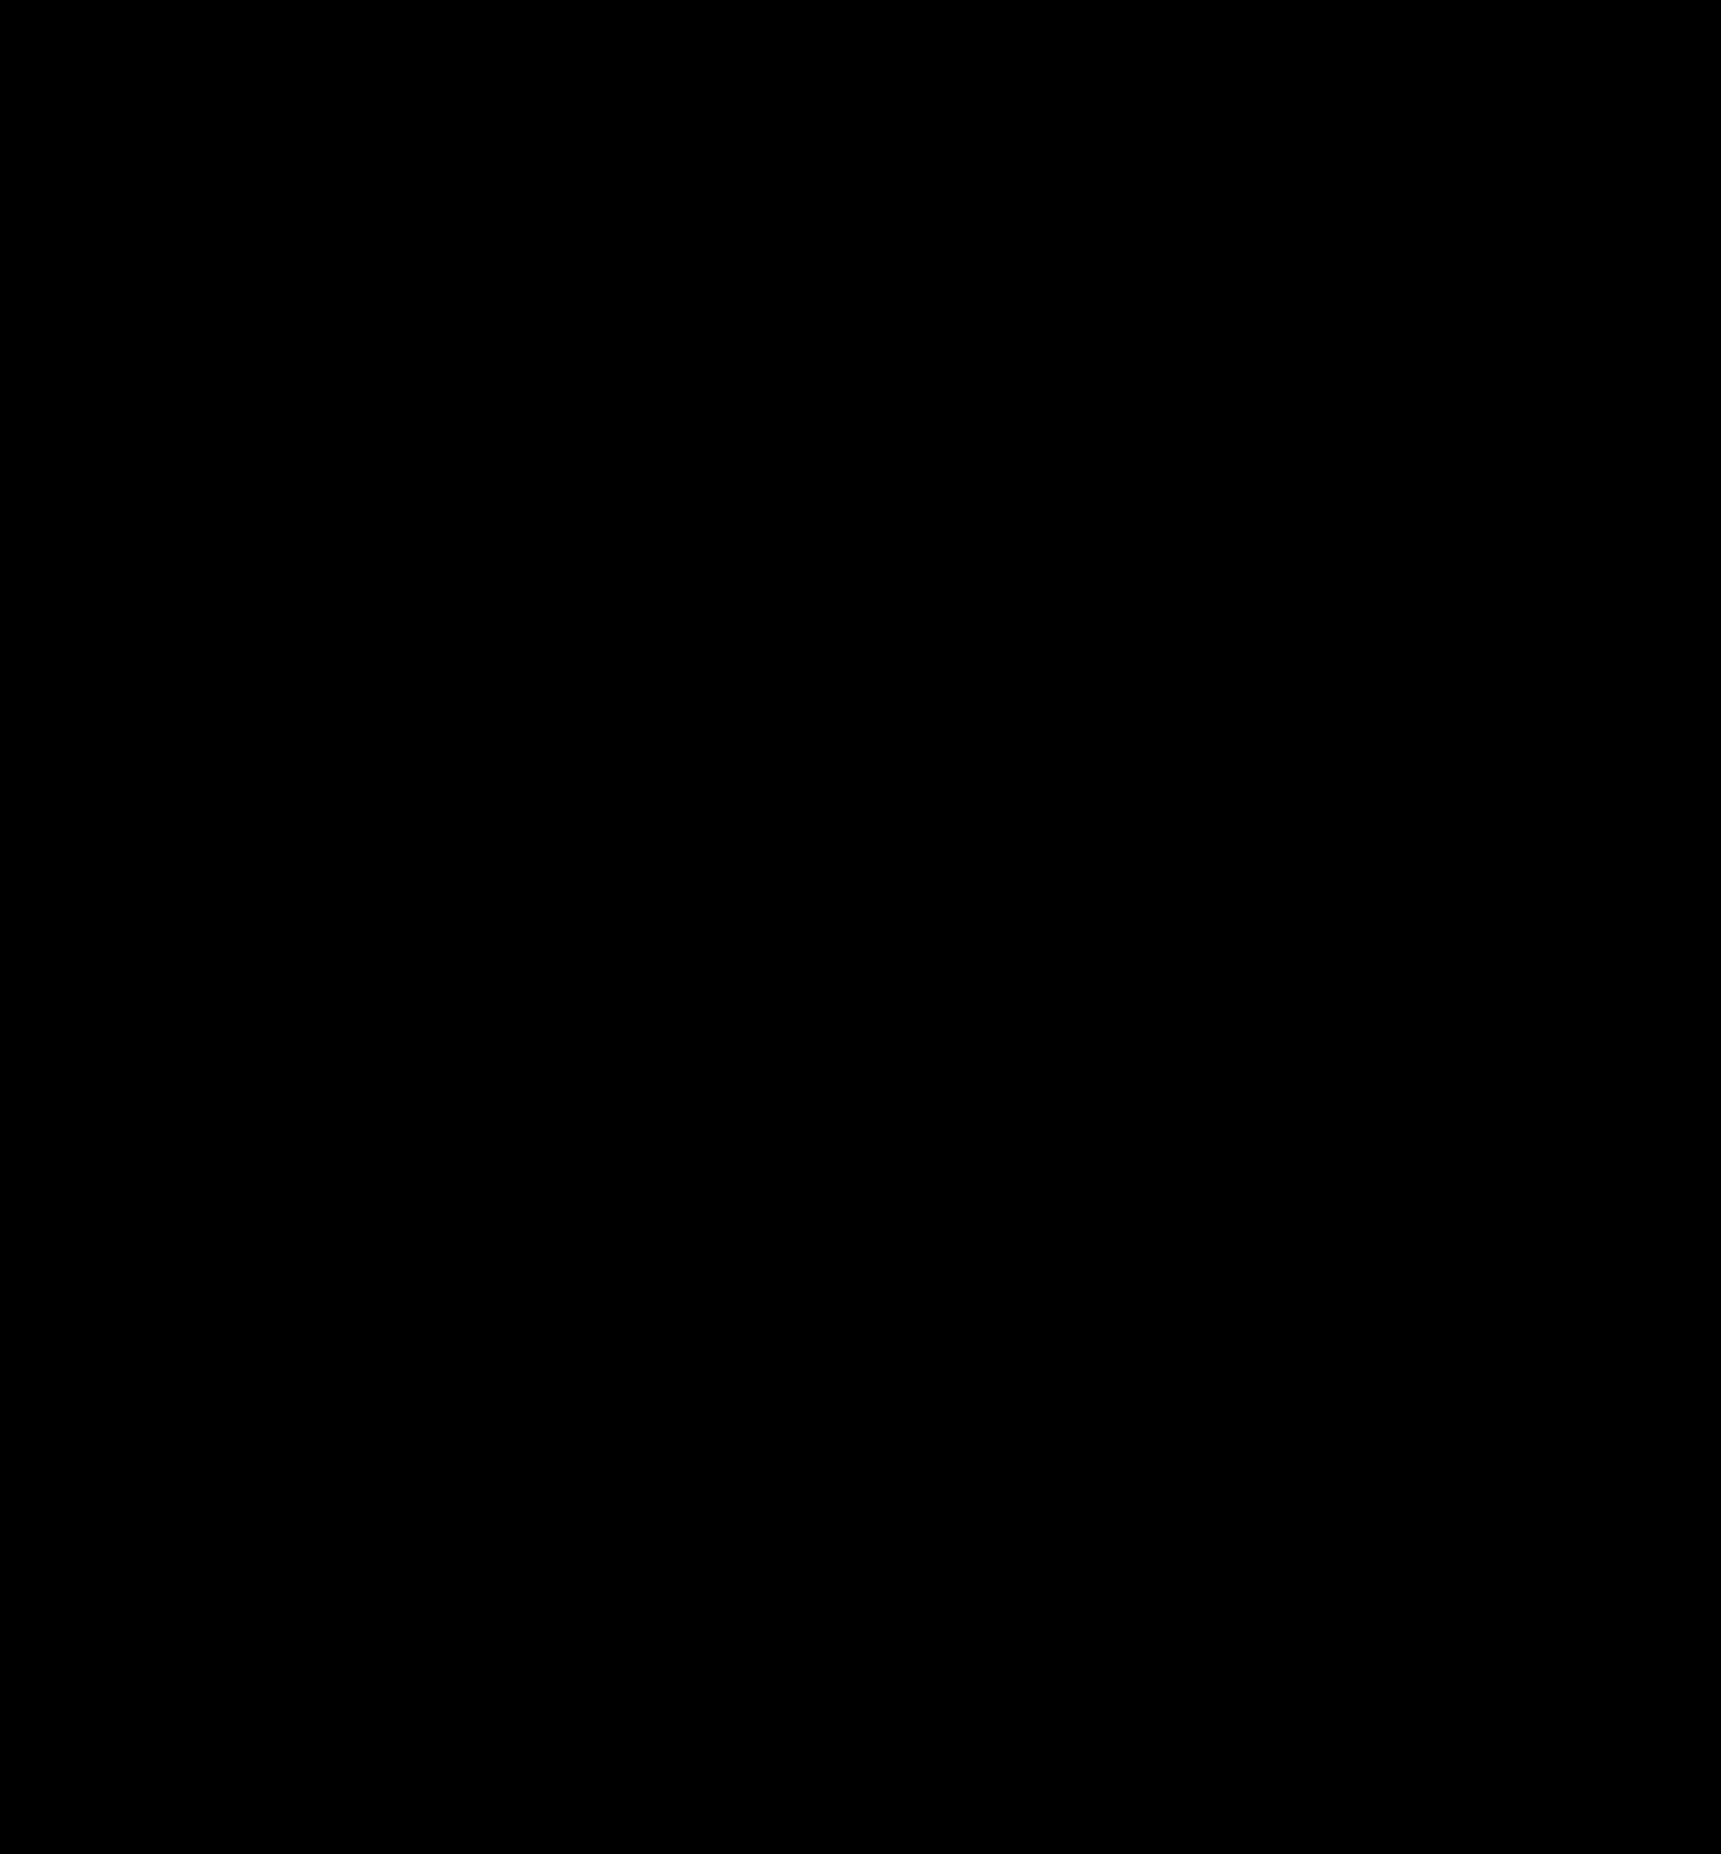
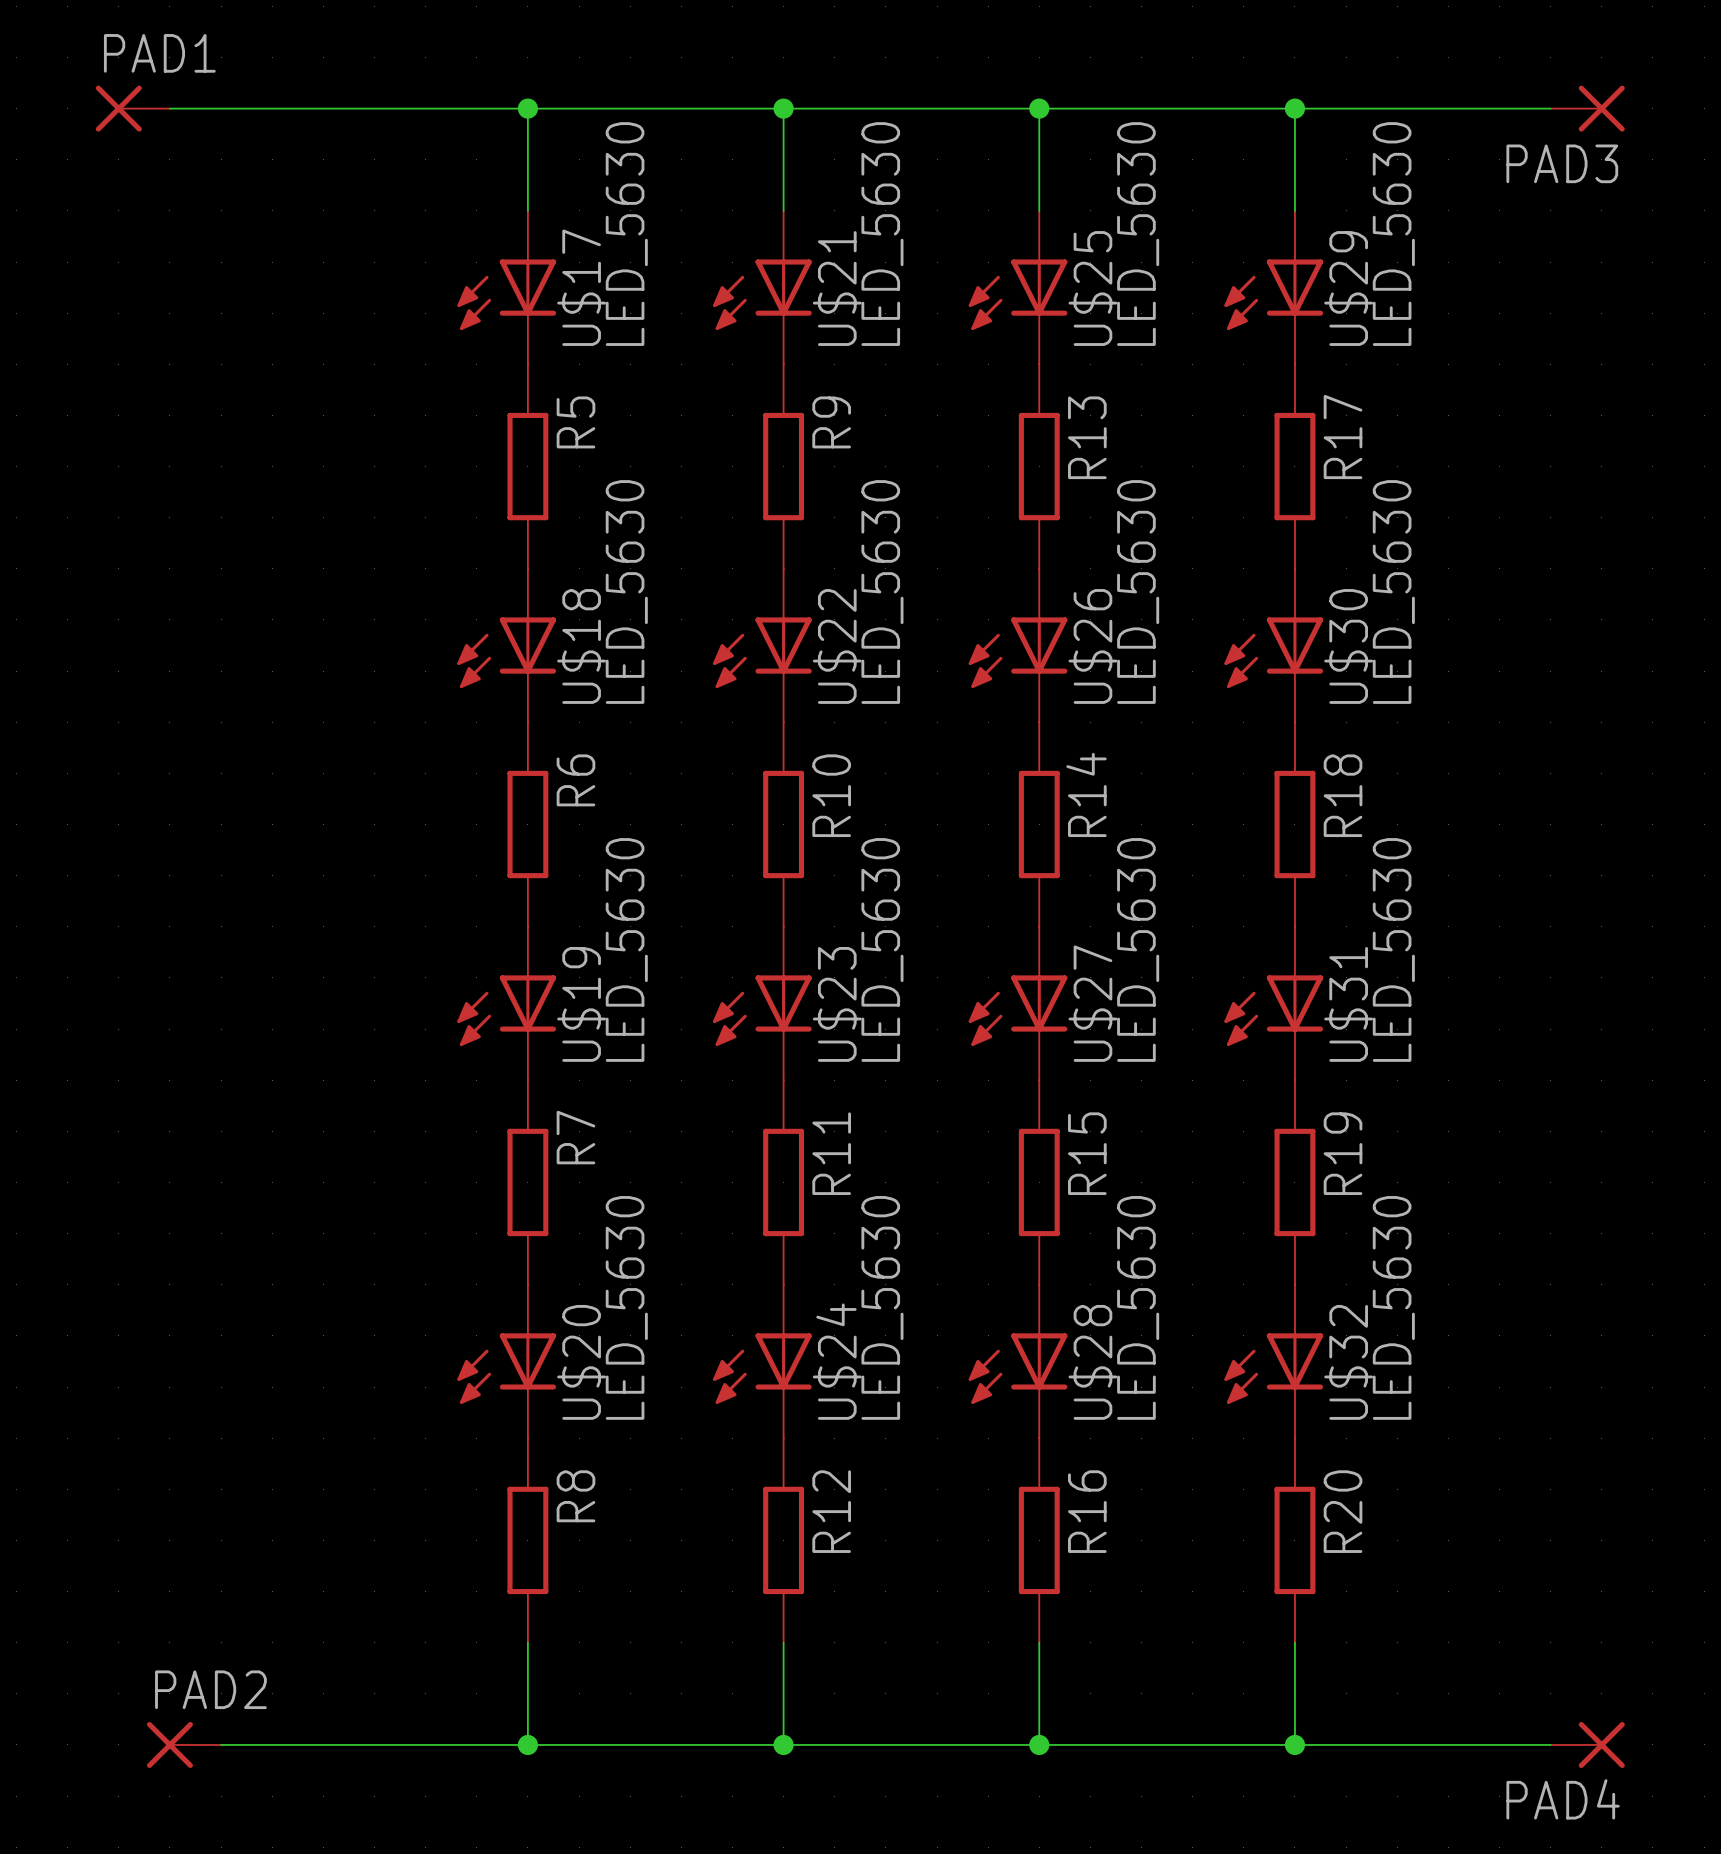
PAD1: none -> (132, 108)
wire: none -> (169, 108) (1550, 108)
wire: none -> (527, 108) (527, 210)
junction: none -> (527, 108)
wire: none -> (783, 108) (783, 210)
junction: none -> (783, 108)
wire: none -> (1039, 108) (1039, 210)
junction: none -> (1039, 108)
wire: none -> (1294, 108) (1294, 210)
junction: none -> (1294, 108)
PAD3: none -> (1587, 108)
U$17: none -> LED_5630 (506, 287)
U$21: none -> LED_5630 (762, 287)
U$25: none -> LED_5630 (1018, 287)
U$29: none -> LED_5630 (1273, 287)
R5: none -> (527, 466)
R9: none -> (783, 466)
R13: none -> (1039, 466)
R17: none -> (1294, 466)
U$18: none -> LED_5630 (506, 645)
U$22: none -> LED_5630 (762, 645)
U$26: none -> LED_5630 (1018, 645)
U$30: none -> LED_5630 (1273, 645)
R6: none -> (527, 824)
R10: none -> (783, 824)
R14: none -> (1039, 824)
R18: none -> (1294, 824)
U$19: none -> LED_5630 (506, 1003)
U$23: none -> LED_5630 (762, 1003)
U$27: none -> LED_5630 (1018, 1003)
U$31: none -> LED_5630 (1273, 1003)
R7: none -> (527, 1182)
R11: none -> (783, 1182)
R15: none -> (1039, 1182)
R19: none -> (1294, 1182)
U$20: none -> LED_5630 (506, 1361)
U$24: none -> LED_5630 (762, 1361)
U$28: none -> LED_5630 (1018, 1361)
U$32: none -> LED_5630 (1273, 1361)
R8: none -> (527, 1540)
R12: none -> (783, 1540)
R16: none -> (1039, 1540)
R20: none -> (1294, 1540)
wire: none -> (527, 1642) (527, 1744)
wire: none -> (783, 1642) (783, 1744)
wire: none -> (1039, 1642) (1039, 1744)
wire: none -> (1294, 1642) (1294, 1744)
PAD2: none -> (184, 1744)
wire: none -> (221, 1744) (1550, 1744)
junction: none -> (527, 1744)
junction: none -> (783, 1744)
junction: none -> (1039, 1744)
junction: none -> (1294, 1744)
PAD4: none -> (1587, 1744)

